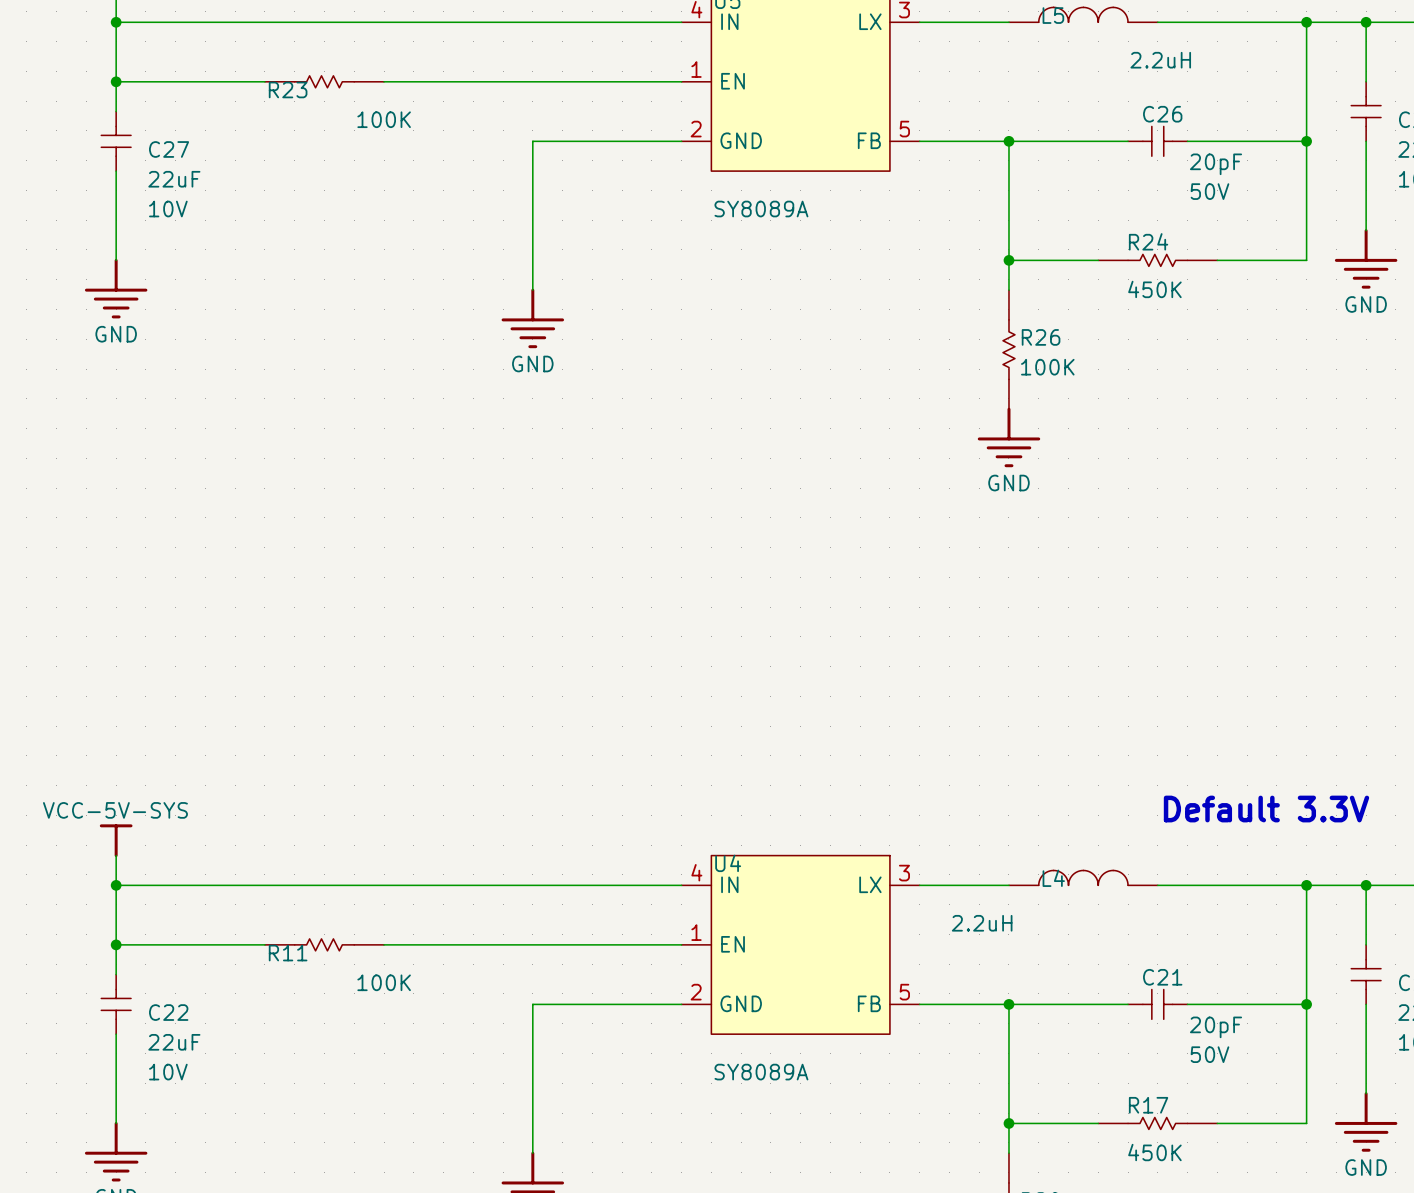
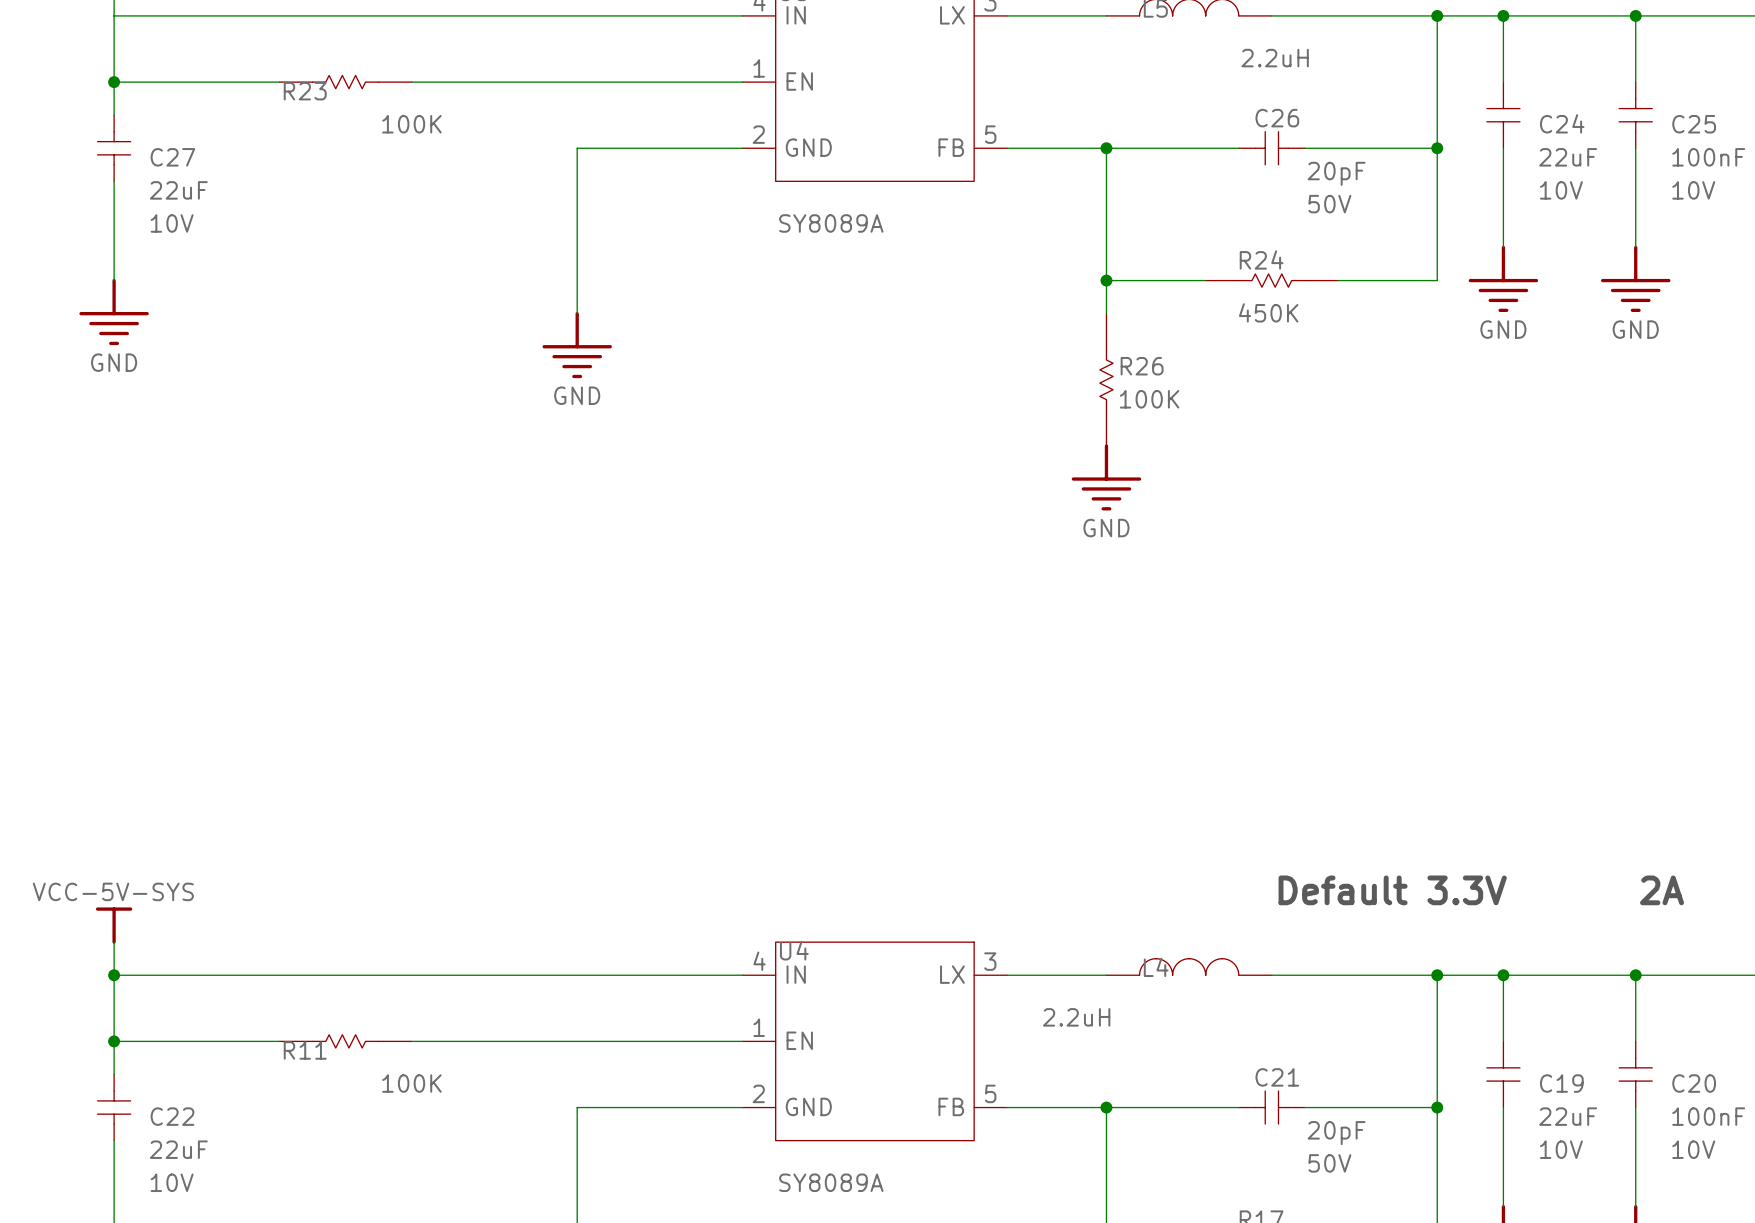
junction: (116, 22) -> none

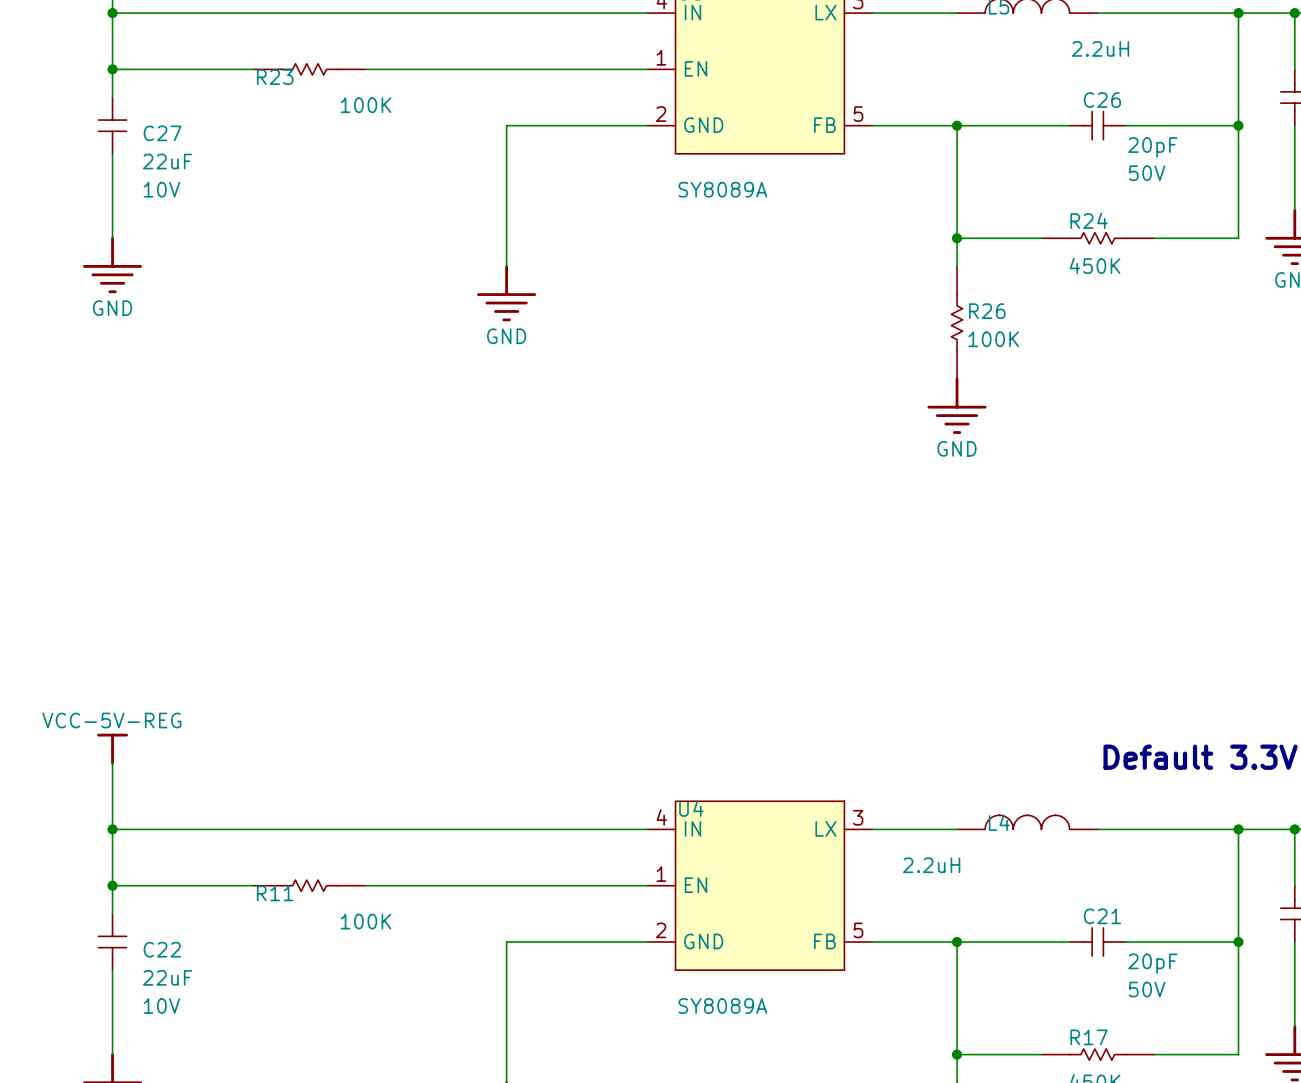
junction: none -> (112, 13)
power symbol: none -> VCC-5V-REG (112, 749)
power symbol: VCC-5V-SYS (114, 925) -> none

